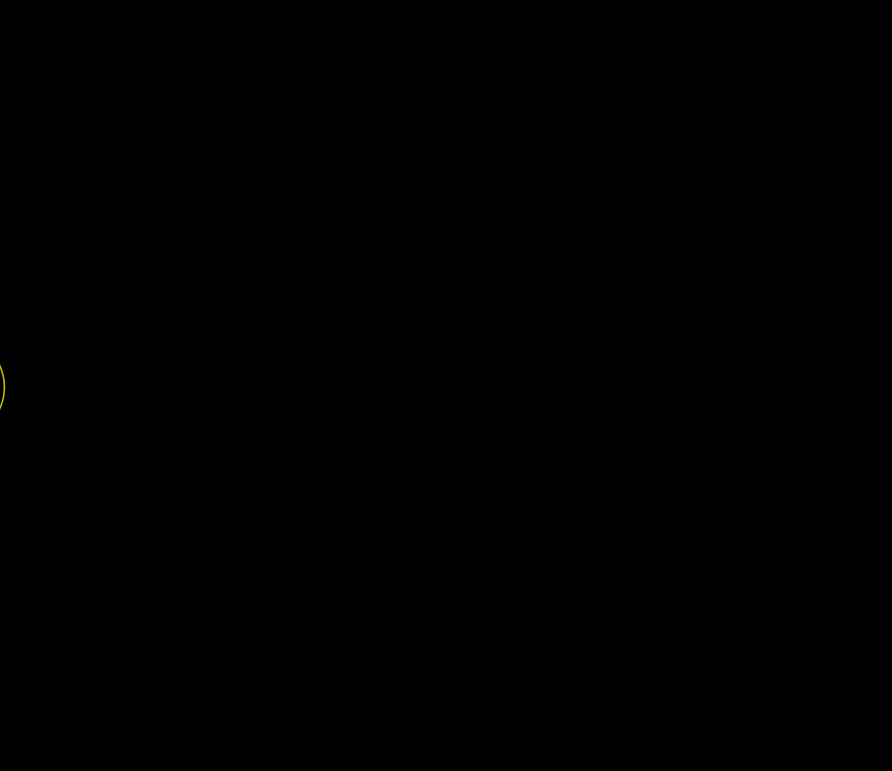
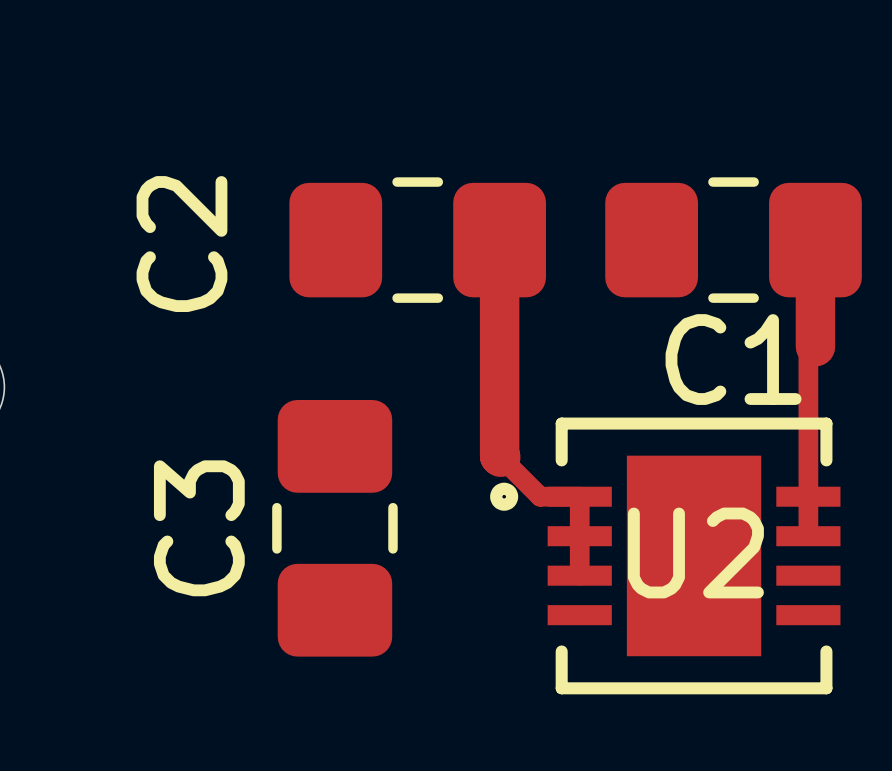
C2: none -> (417, 240)
track: none -> (499, 240) (500, 457)
C1: none -> (733, 240)
track: none -> (815, 240) (815, 346) (808, 353) (808, 536)
track: none -> (492, 449) (540, 496) (579, 496) (579, 575)
C3: none -> (334, 528)
U2: none -> (665, 555)

